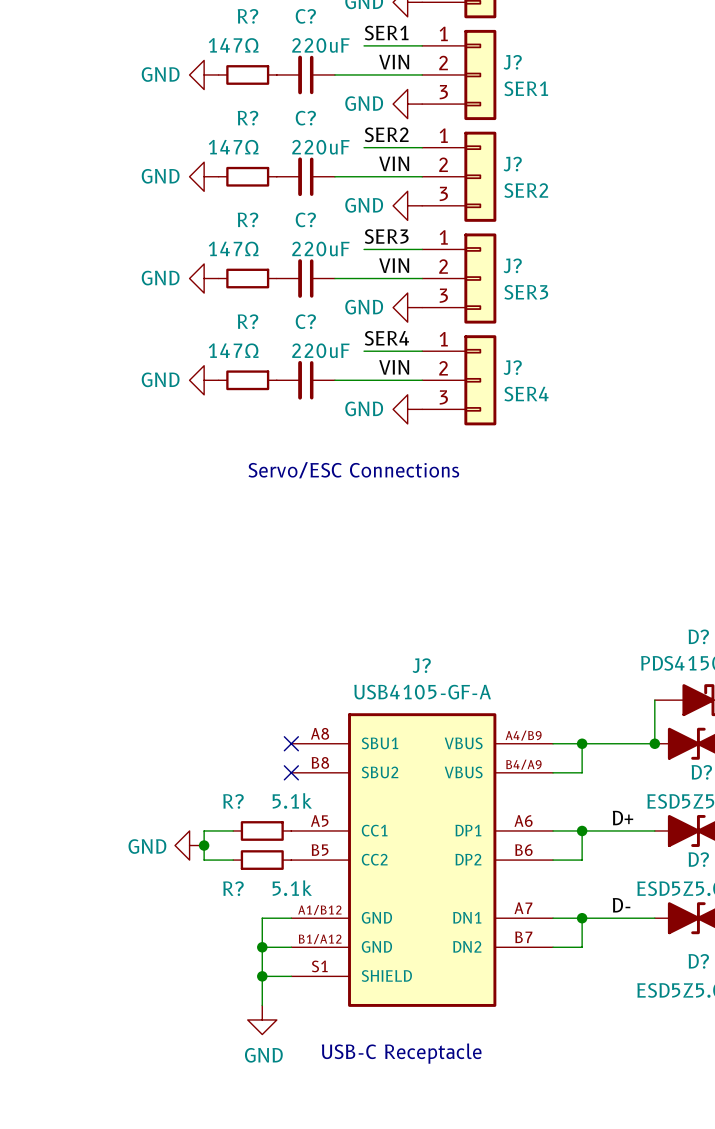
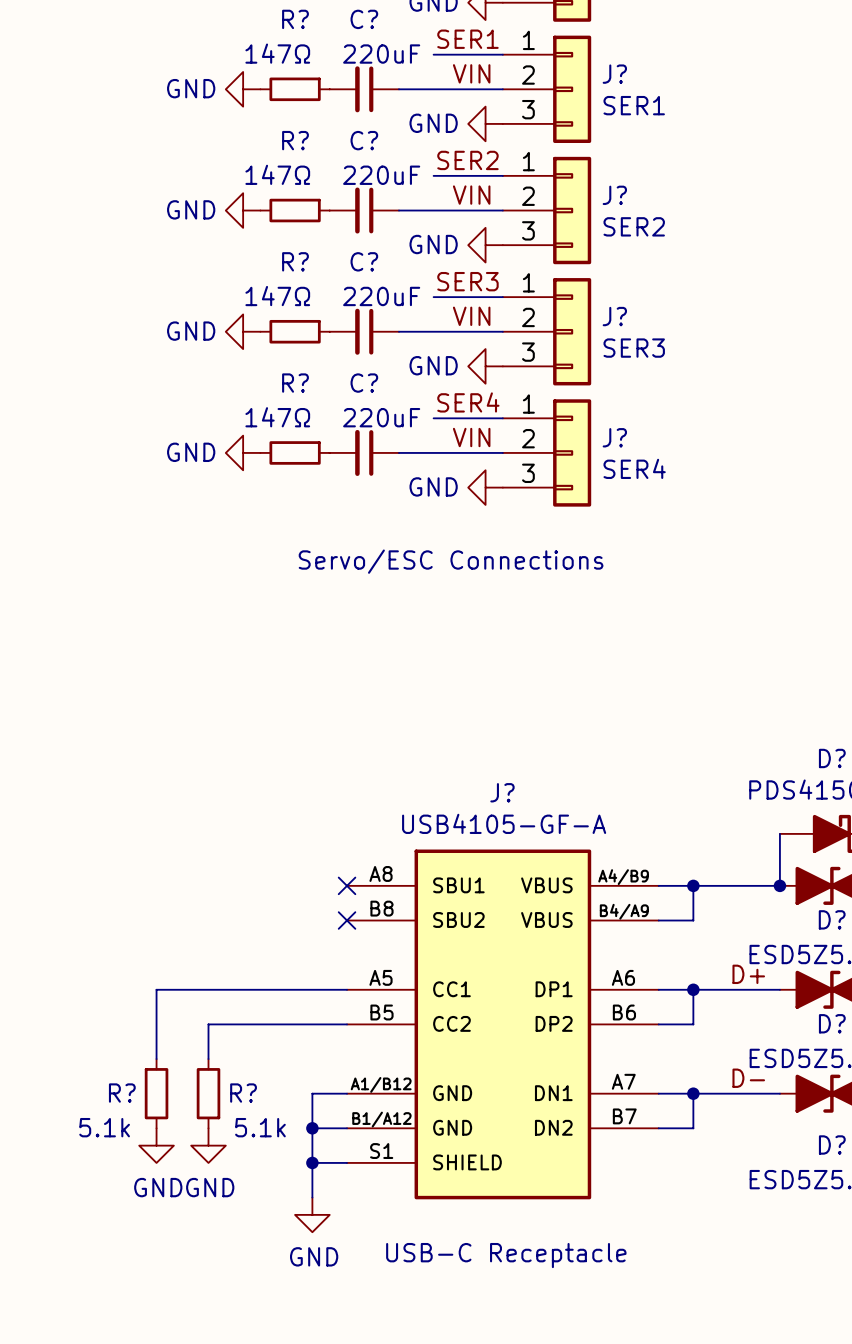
wire: (204, 830) (204, 860) -> (208, 1059) (208, 1024) (243, 1024)
wire: none -> (243, 989) (156, 989) (156, 1059)
wire: none -> (277, 989) (347, 989)
R?: 5.1k (262, 830) -> none
power symbol: GND (189, 845) -> none
junction: (204, 845) -> none
wire: none -> (277, 1024) (347, 1024)
R?: 5.1k (262, 860) -> none
R?: none -> 5.1k (156, 1093)
R?: none -> 5.1k (208, 1093)
power symbol: none -> GND (156, 1145)
power symbol: none -> GND (208, 1145)

